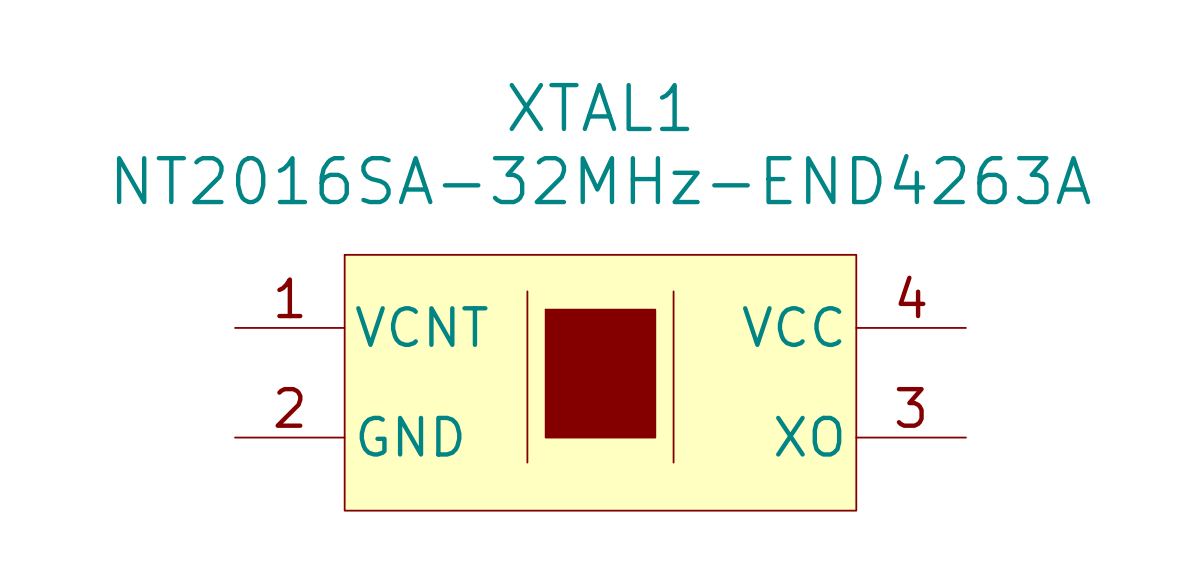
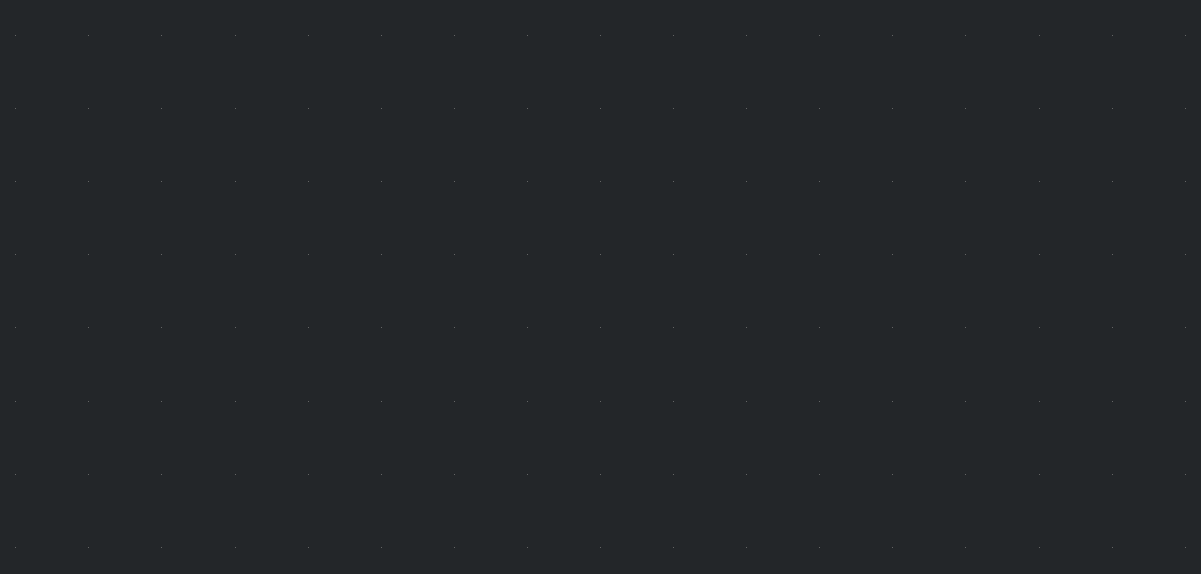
XTAL1: NT2016SA-32MHz-END4263A (600, 382) -> none

